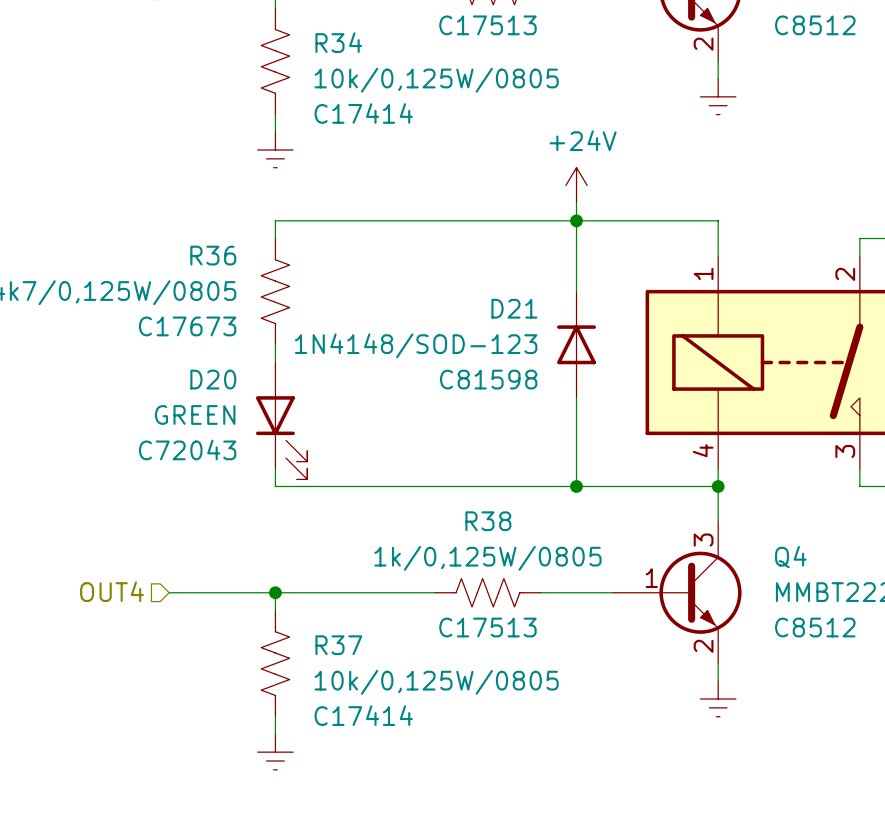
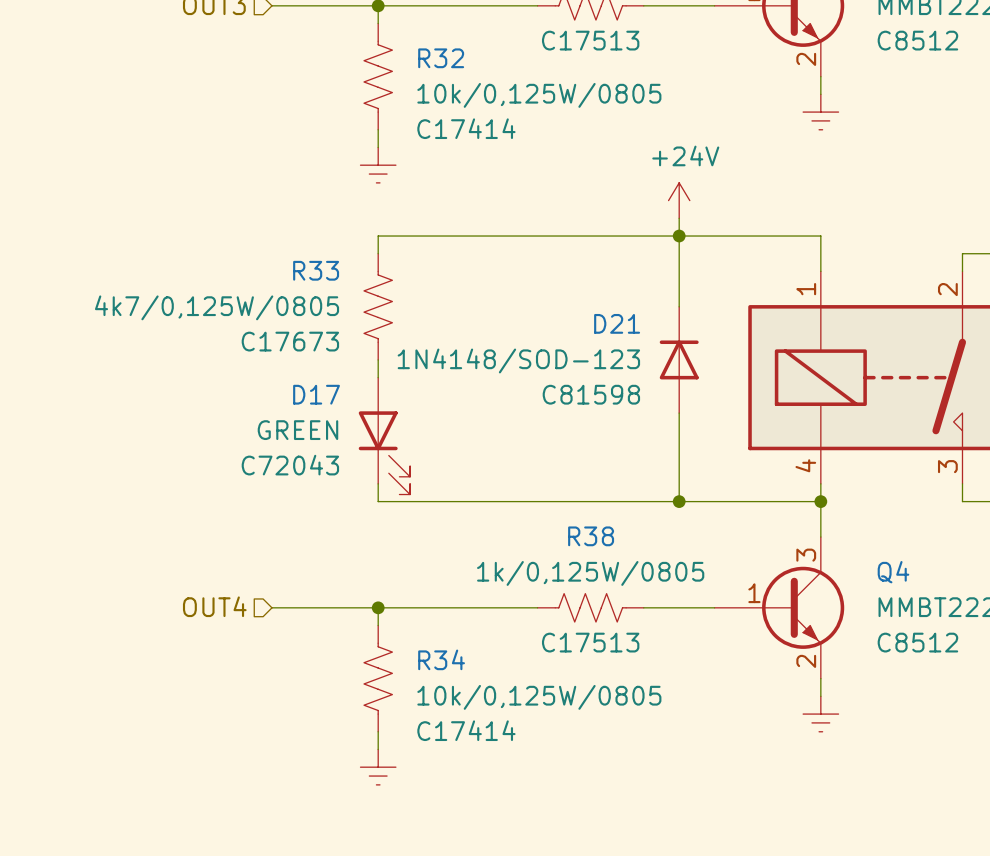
R34 name: R34 (338, 42) -> R32 (441, 58)
R36 name: R36 (213, 255) -> R33 (316, 270)
D20 name: D20 (213, 379) -> D17 (316, 394)
R37 name: R37 (338, 645) -> R34 (441, 659)

